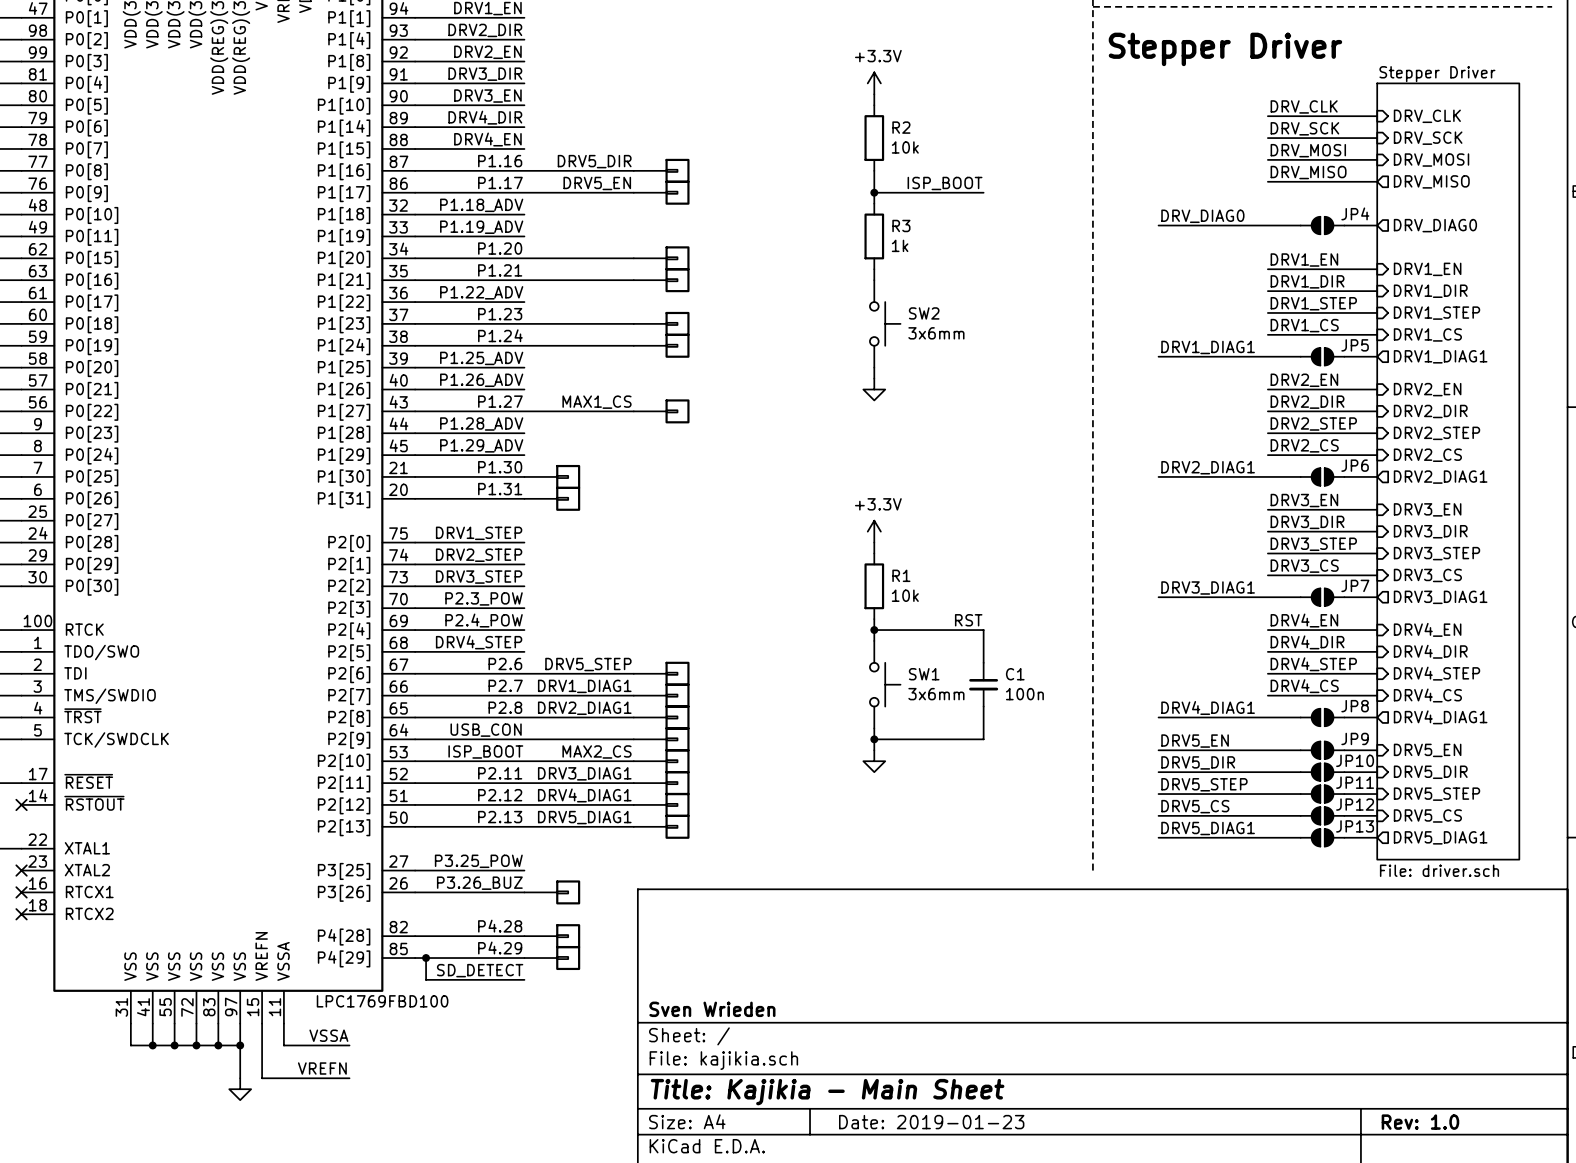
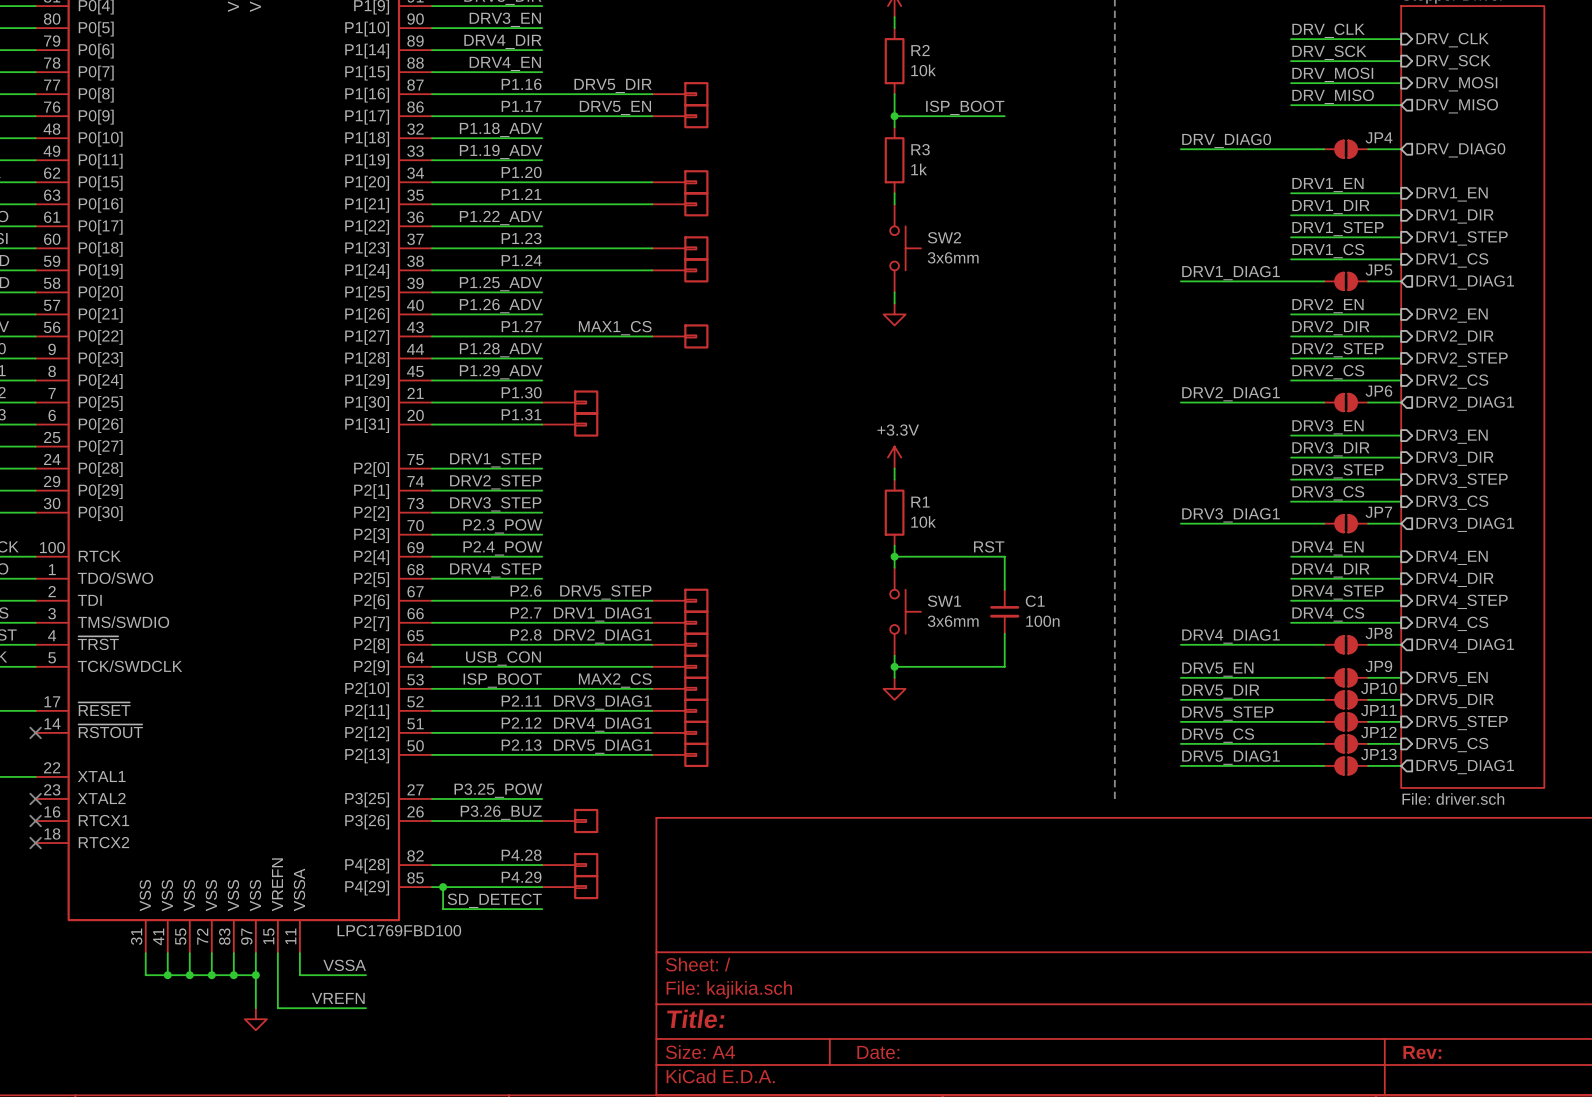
title block: Sven Wrieden (712, 1009) -> none
title block: Title: Kajikia - Main Sheet (827, 1092) -> Title: (695, 1018)
title block: Date: 2019-01-23 (931, 1122) -> Date: (878, 1052)
title block: Rev: 1.0 (1420, 1122) -> Rev: (1422, 1052)

